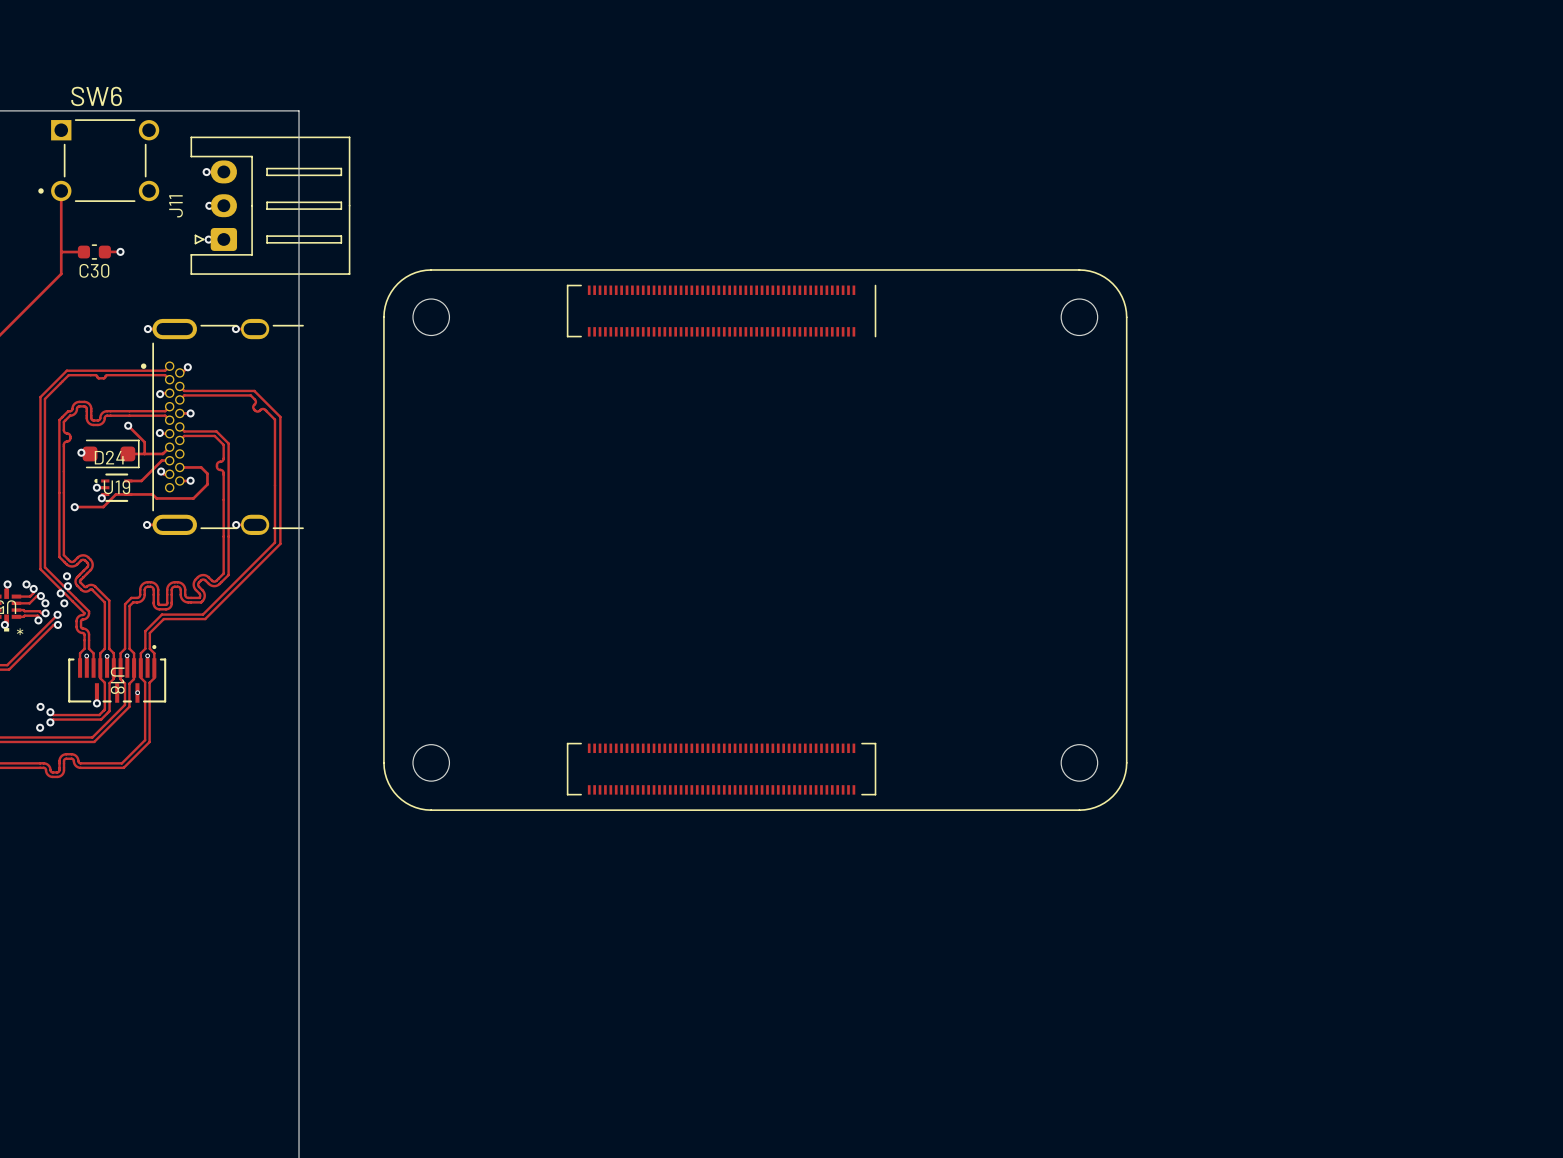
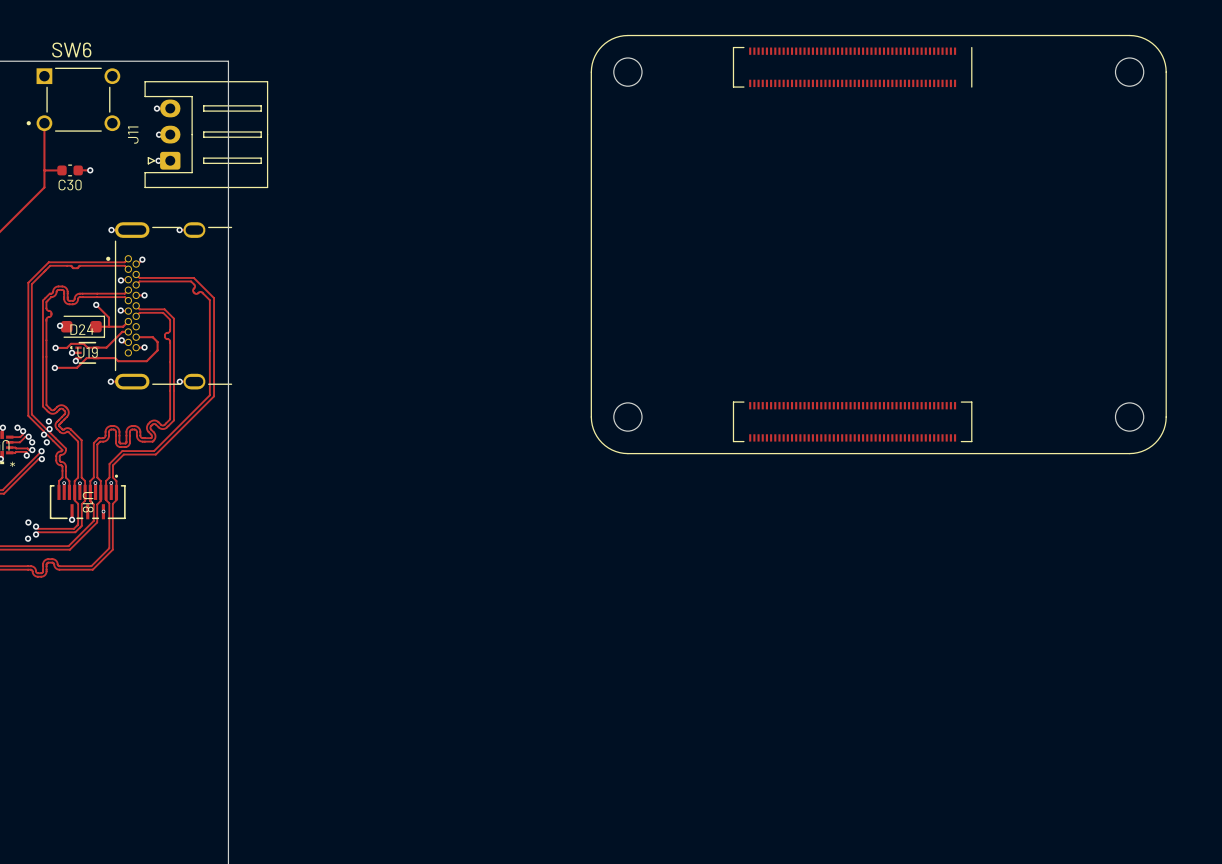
part: none -> (878, 244)
track: none -> (96, 347) (87, 347) (83, 343) (71, 343) (66, 347) (55, 347)
via: none -> (55, 347)
part: (755, 540) -> none

